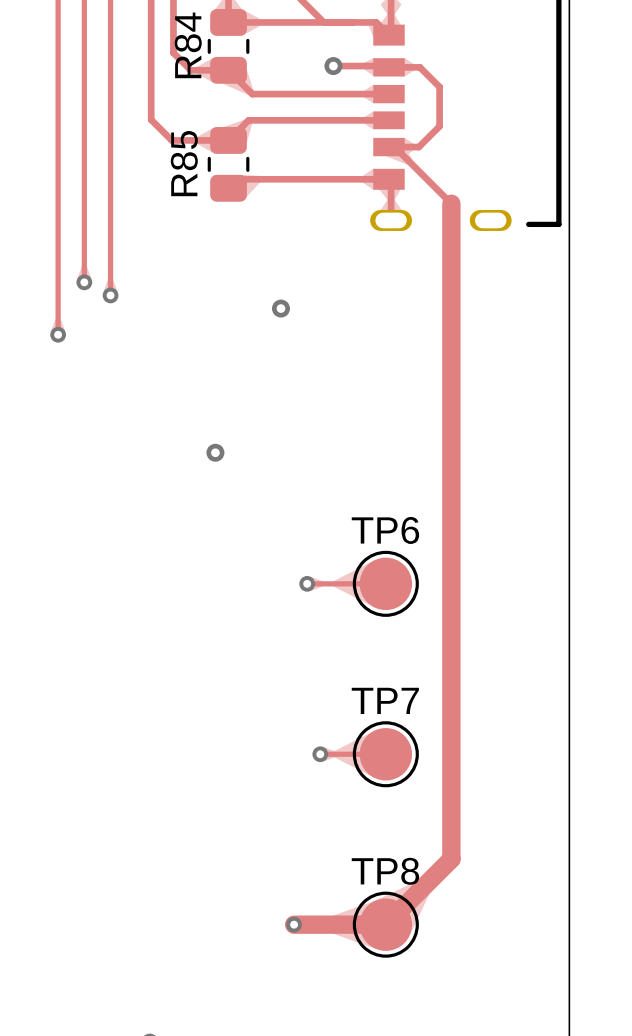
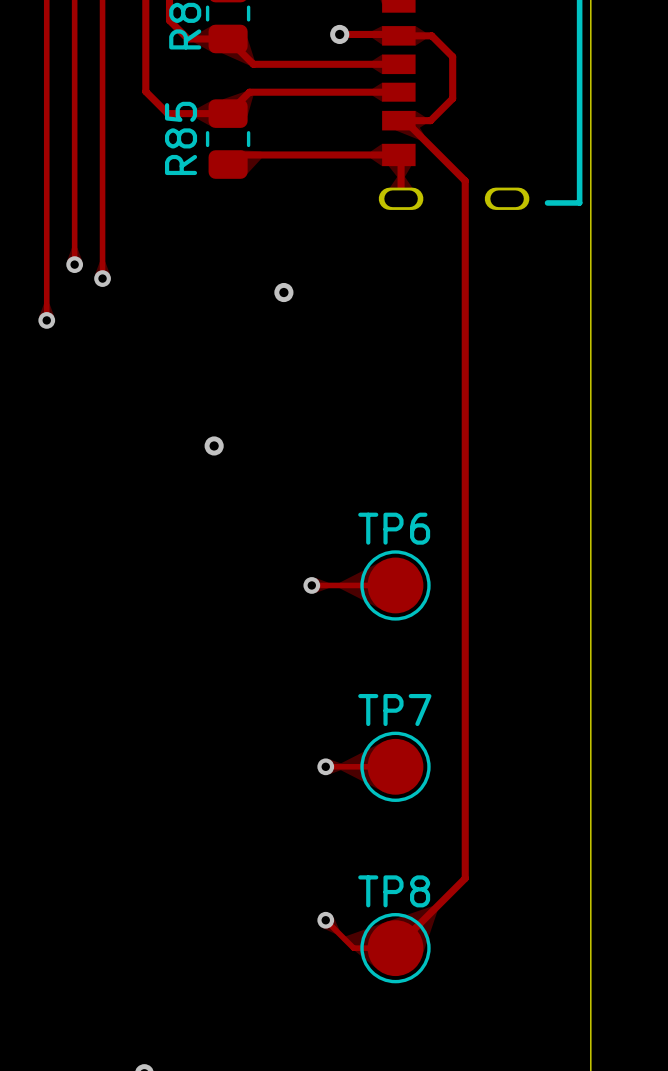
track width: thick (451, 203) (451, 859) (385, 924) (346, 924) -> thin (465, 180) (465, 878) (395, 948) (353, 948)
track: (294, 924) (346, 924) -> (325, 920) (353, 948)
via position: (294, 924) -> (325, 920)

